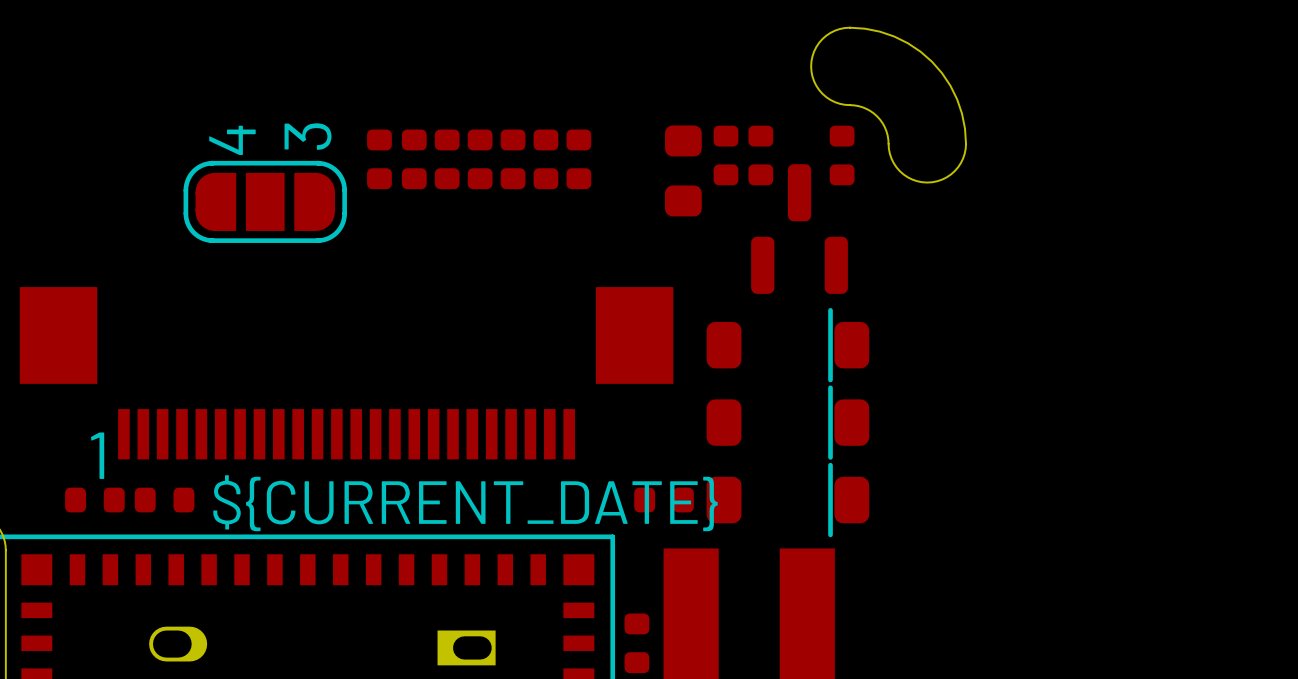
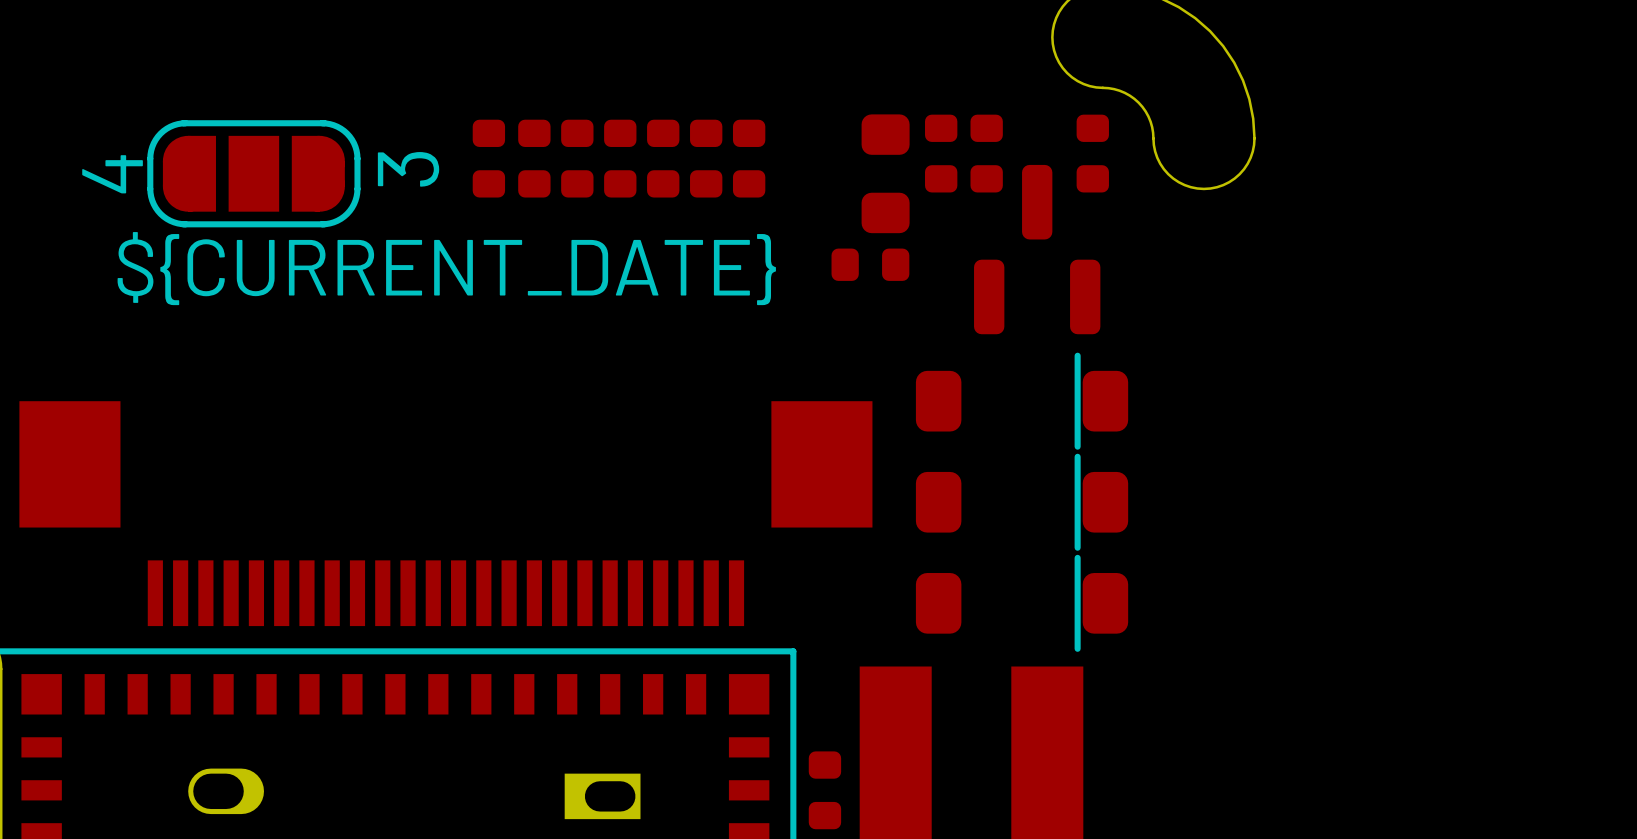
text position: 3 (308, 136) -> 3 (408, 169)
text position: 4 (232, 140) -> 4 (112, 174)
part position: (265, 201) -> (253, 173)
part position: (346, 373) -> (445, 513)
text: 1 (97, 455) -> none
part: (94, 500) -> none
part: (164, 500) -> none
part position: (664, 500) -> (870, 264)
text position: ${CURRENT_DATE} (465, 503) -> ${CURRENT_DATE} (446, 268)

